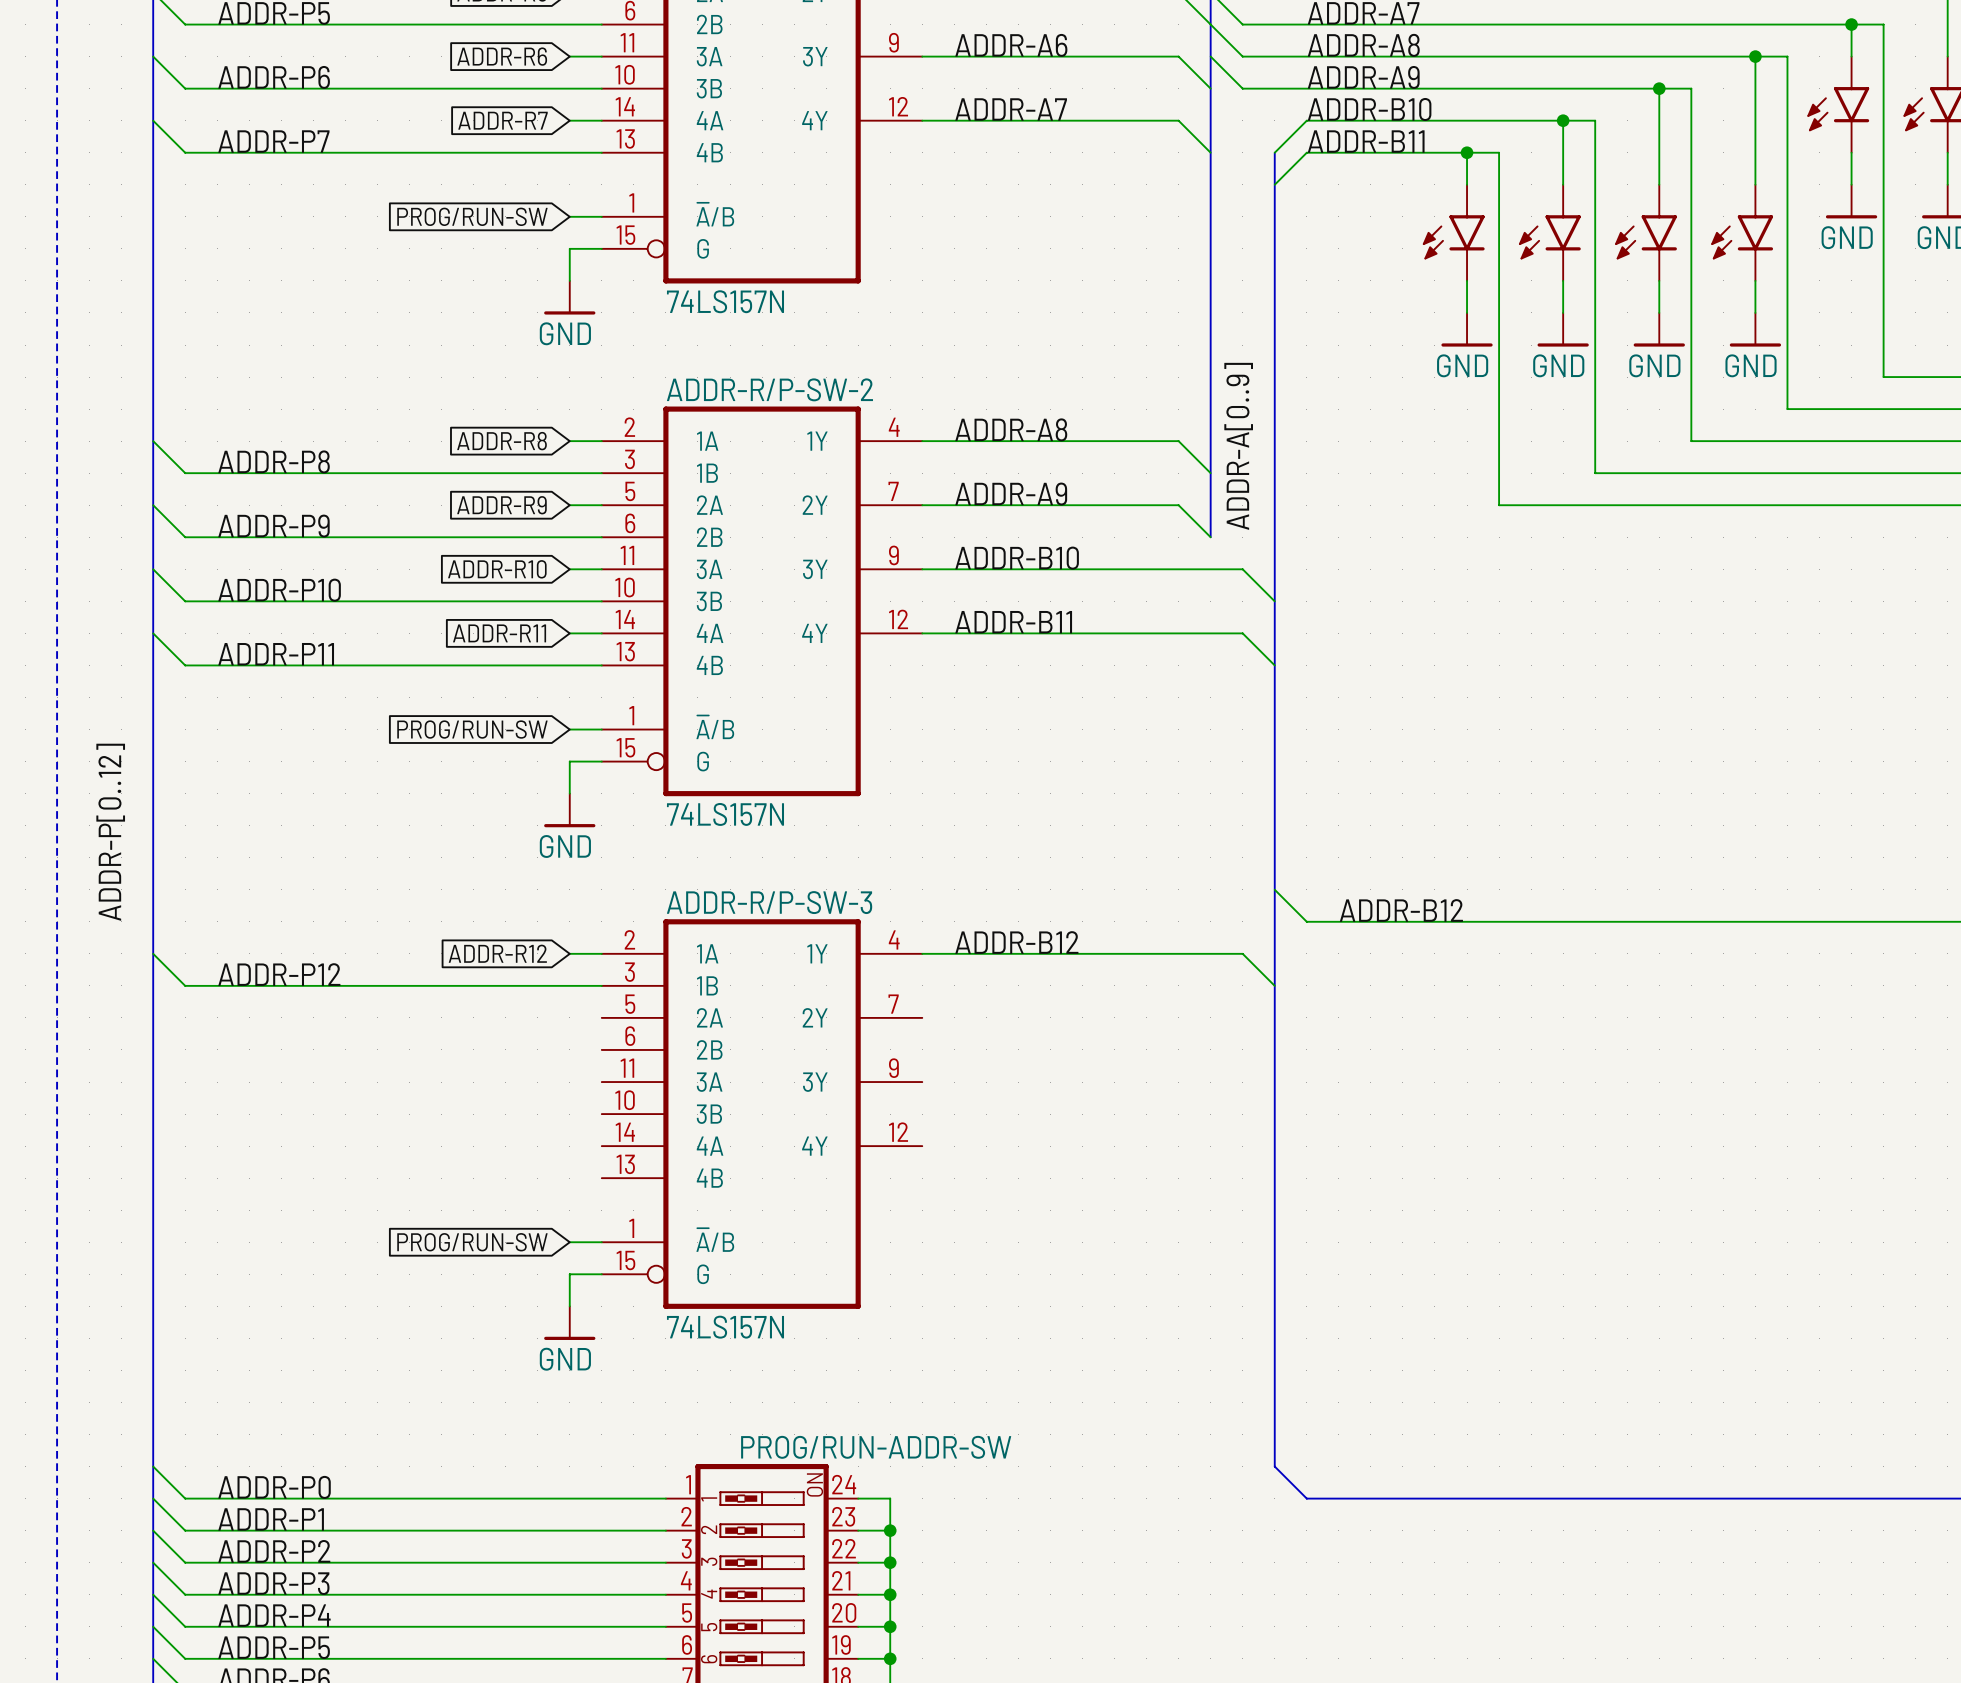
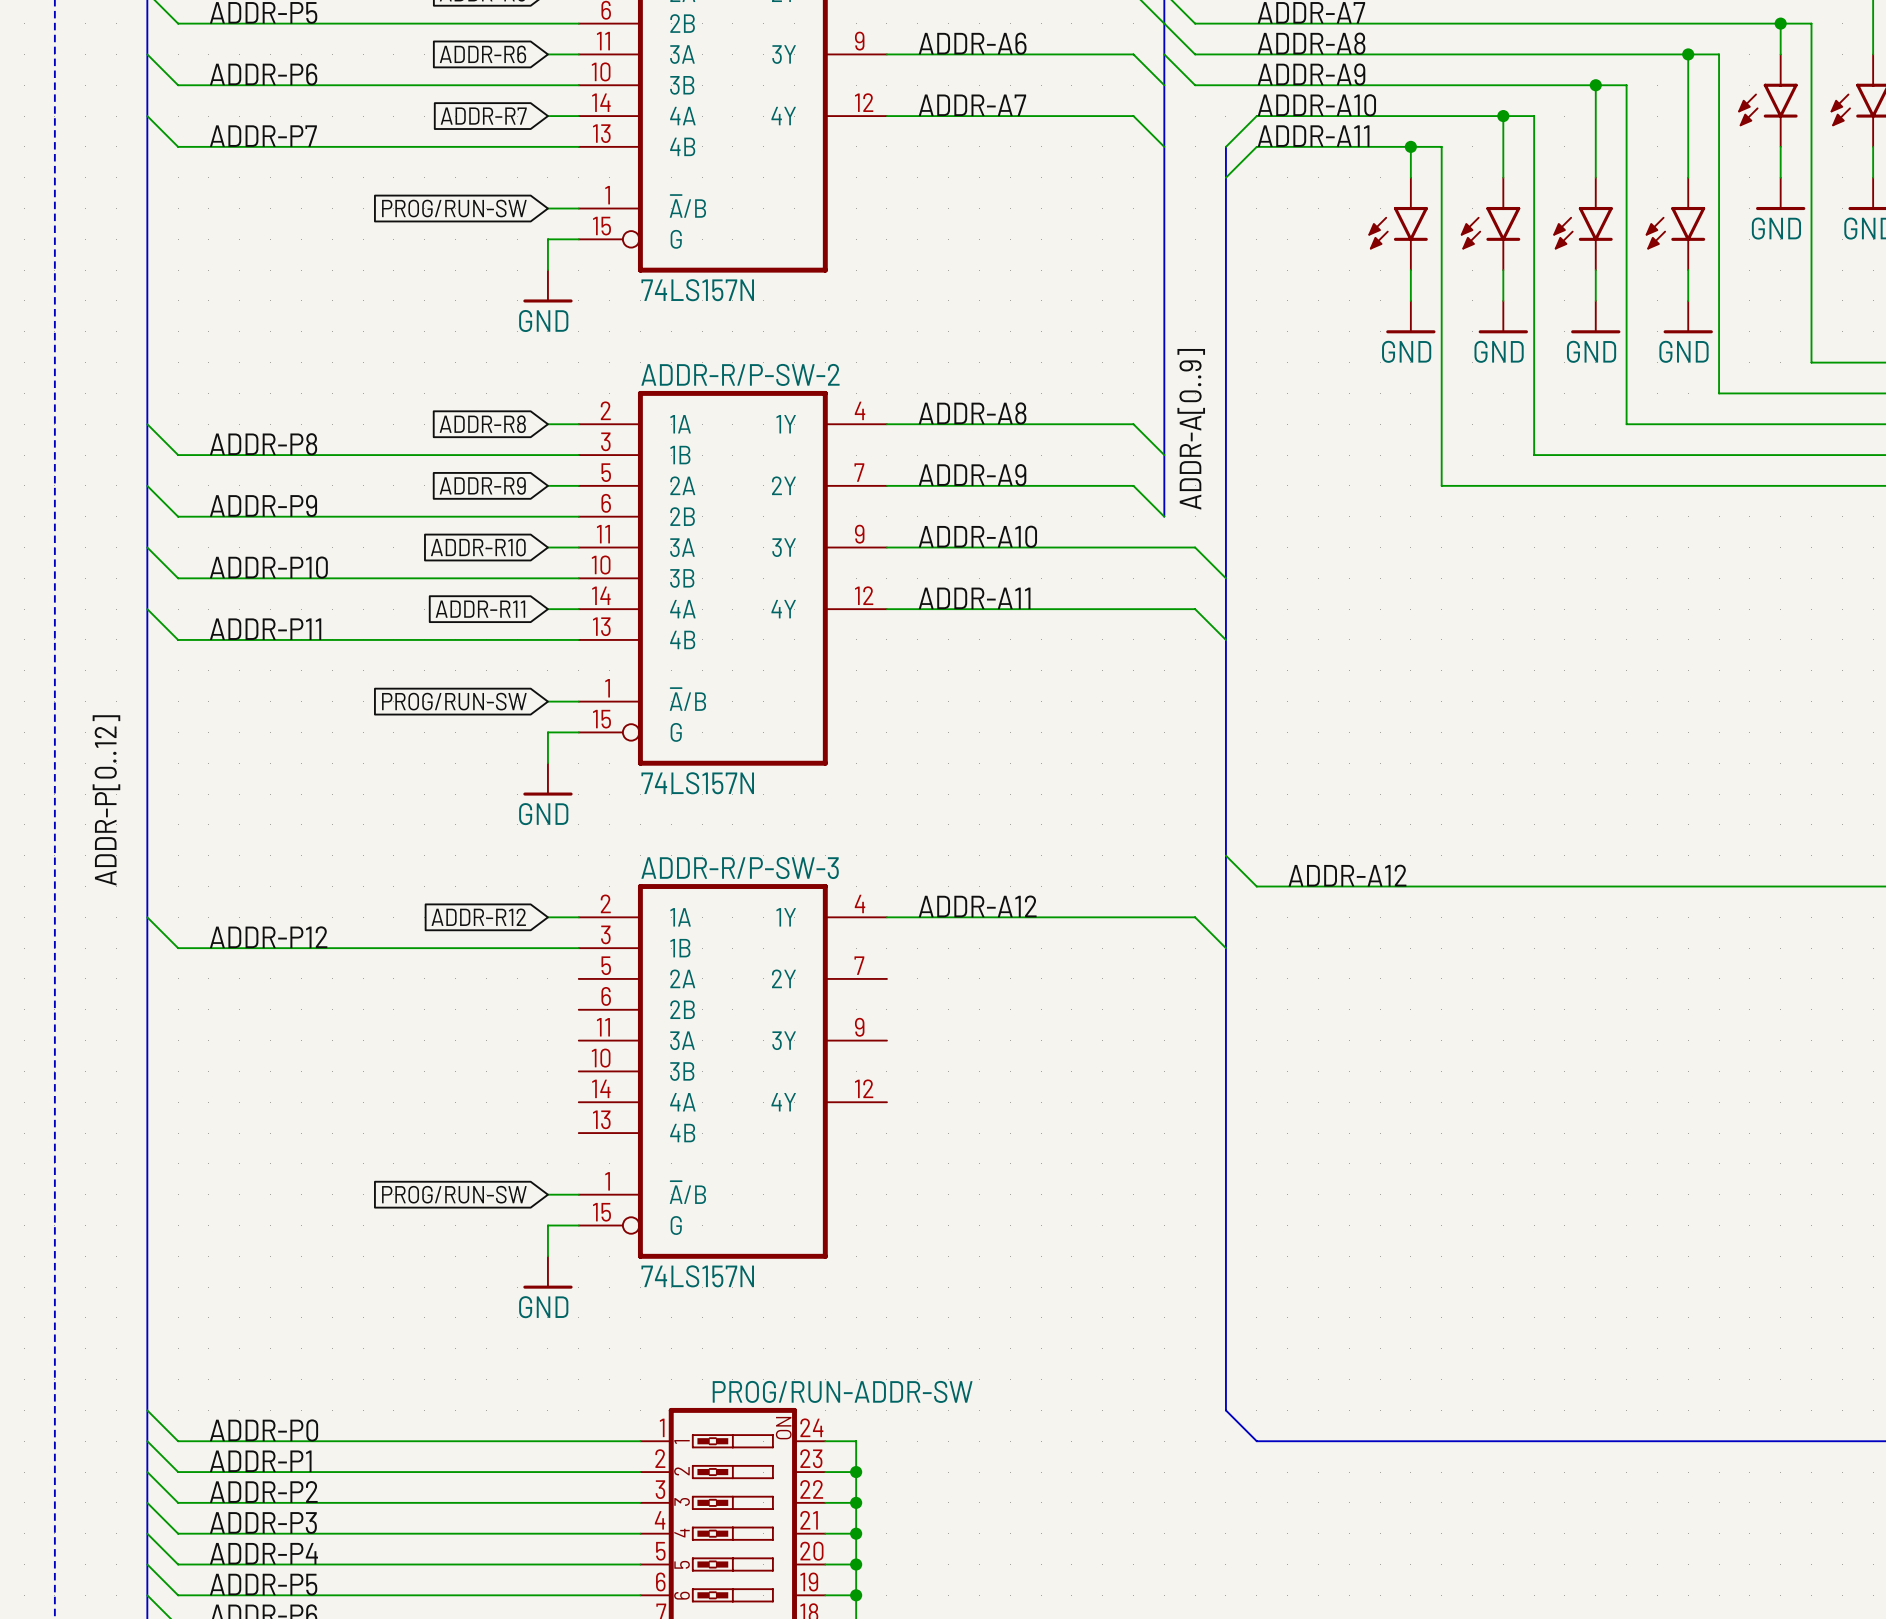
label: ADDR-B10 (1369, 109) -> ADDR-A10 (1316, 105)
label: ADDR-B11 (1366, 141) -> ADDR-A11 (1313, 136)
label: ADDR-B10 (1017, 558) -> ADDR-A10 (977, 536)
label: ADDR-B11 (1013, 622) -> ADDR-A11 (974, 598)
label: ADDR-B12 (1401, 910) -> ADDR-A12 (1347, 875)
label: ADDR-B12 (1016, 942) -> ADDR-A12 (977, 906)

